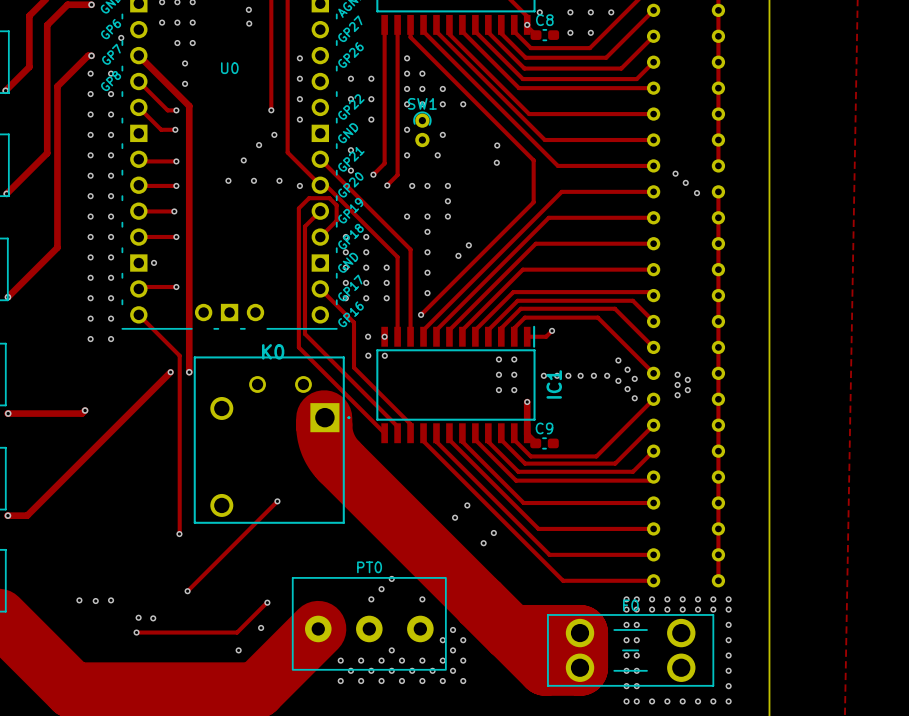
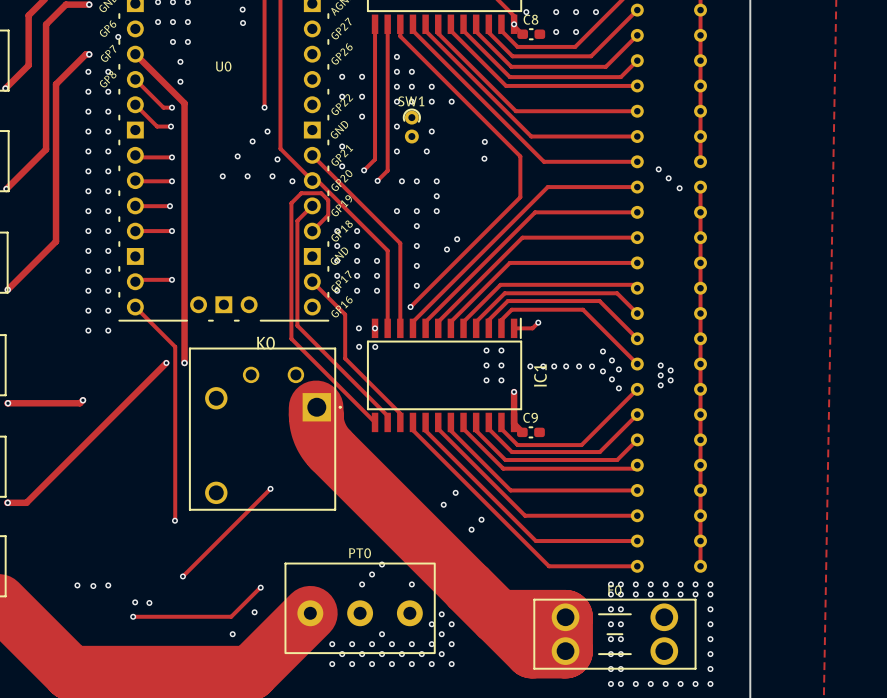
via: (299, 58) -> none
via: (299, 78) -> none
via: (299, 99) -> none
via: (299, 119) -> none
via: none -> (277, 159)
via: (154, 262) -> none

